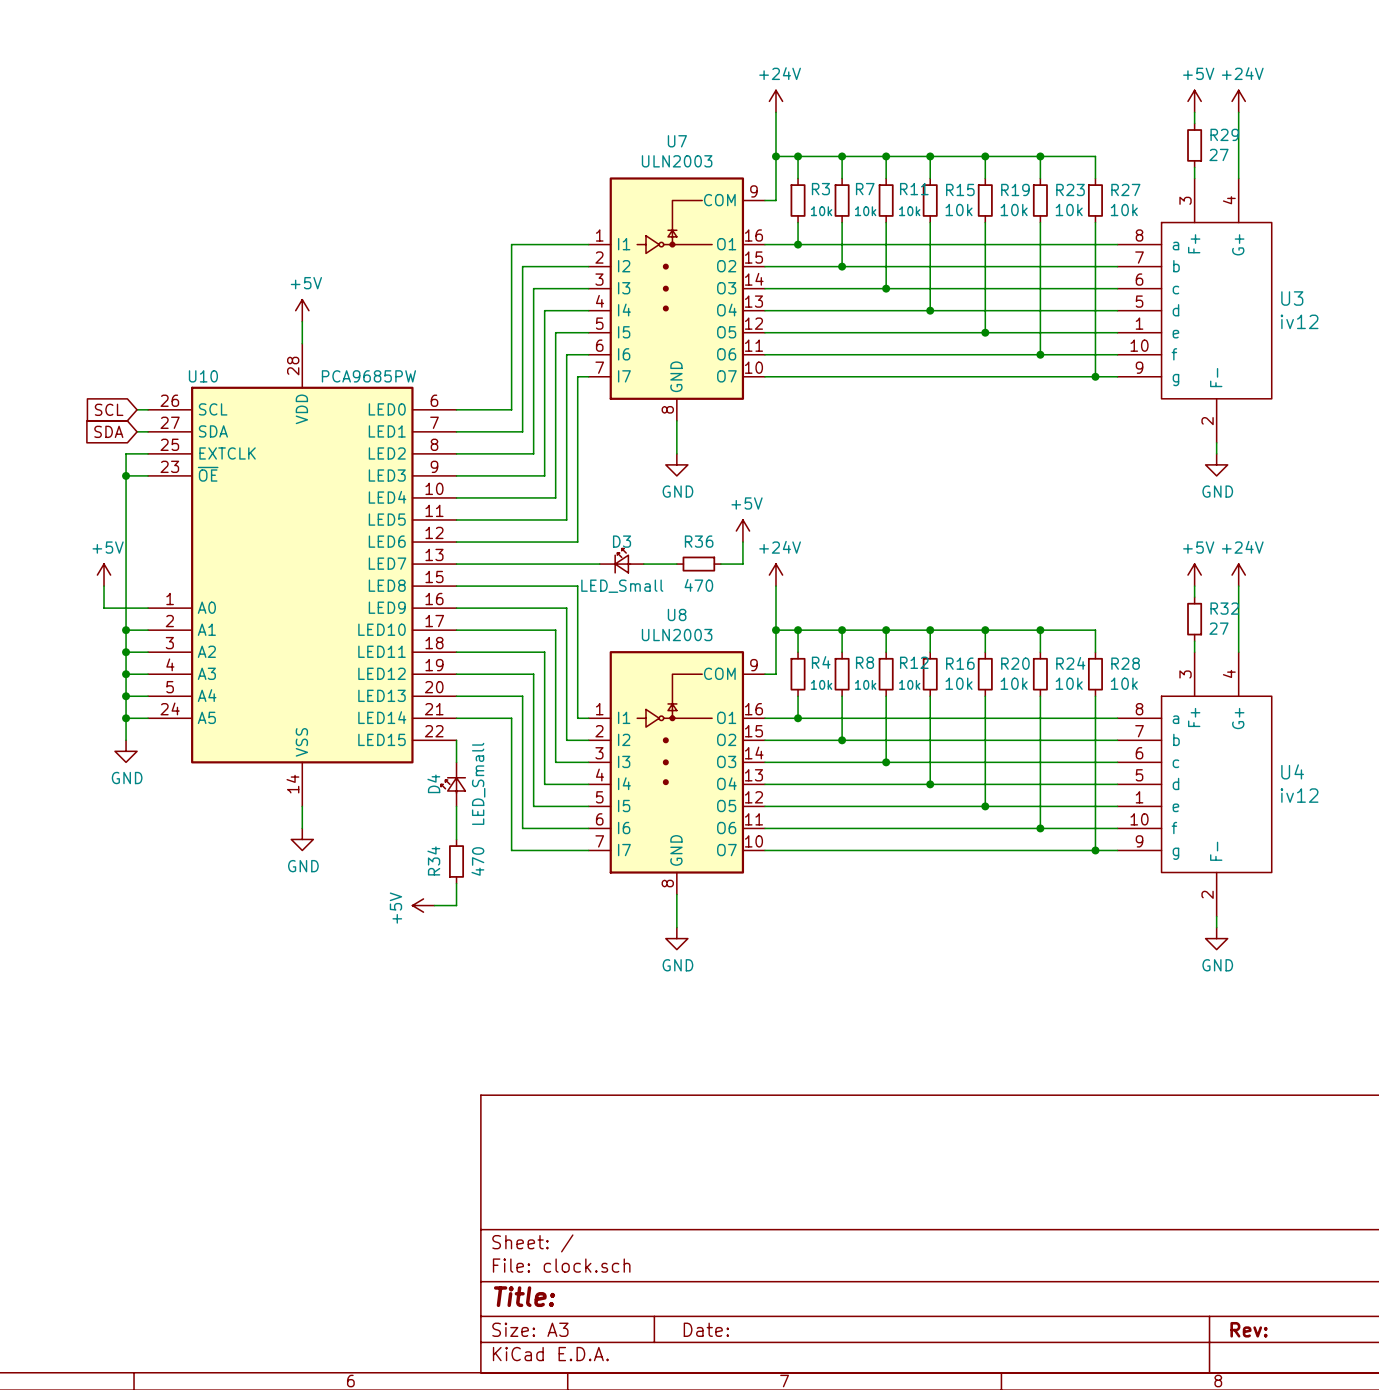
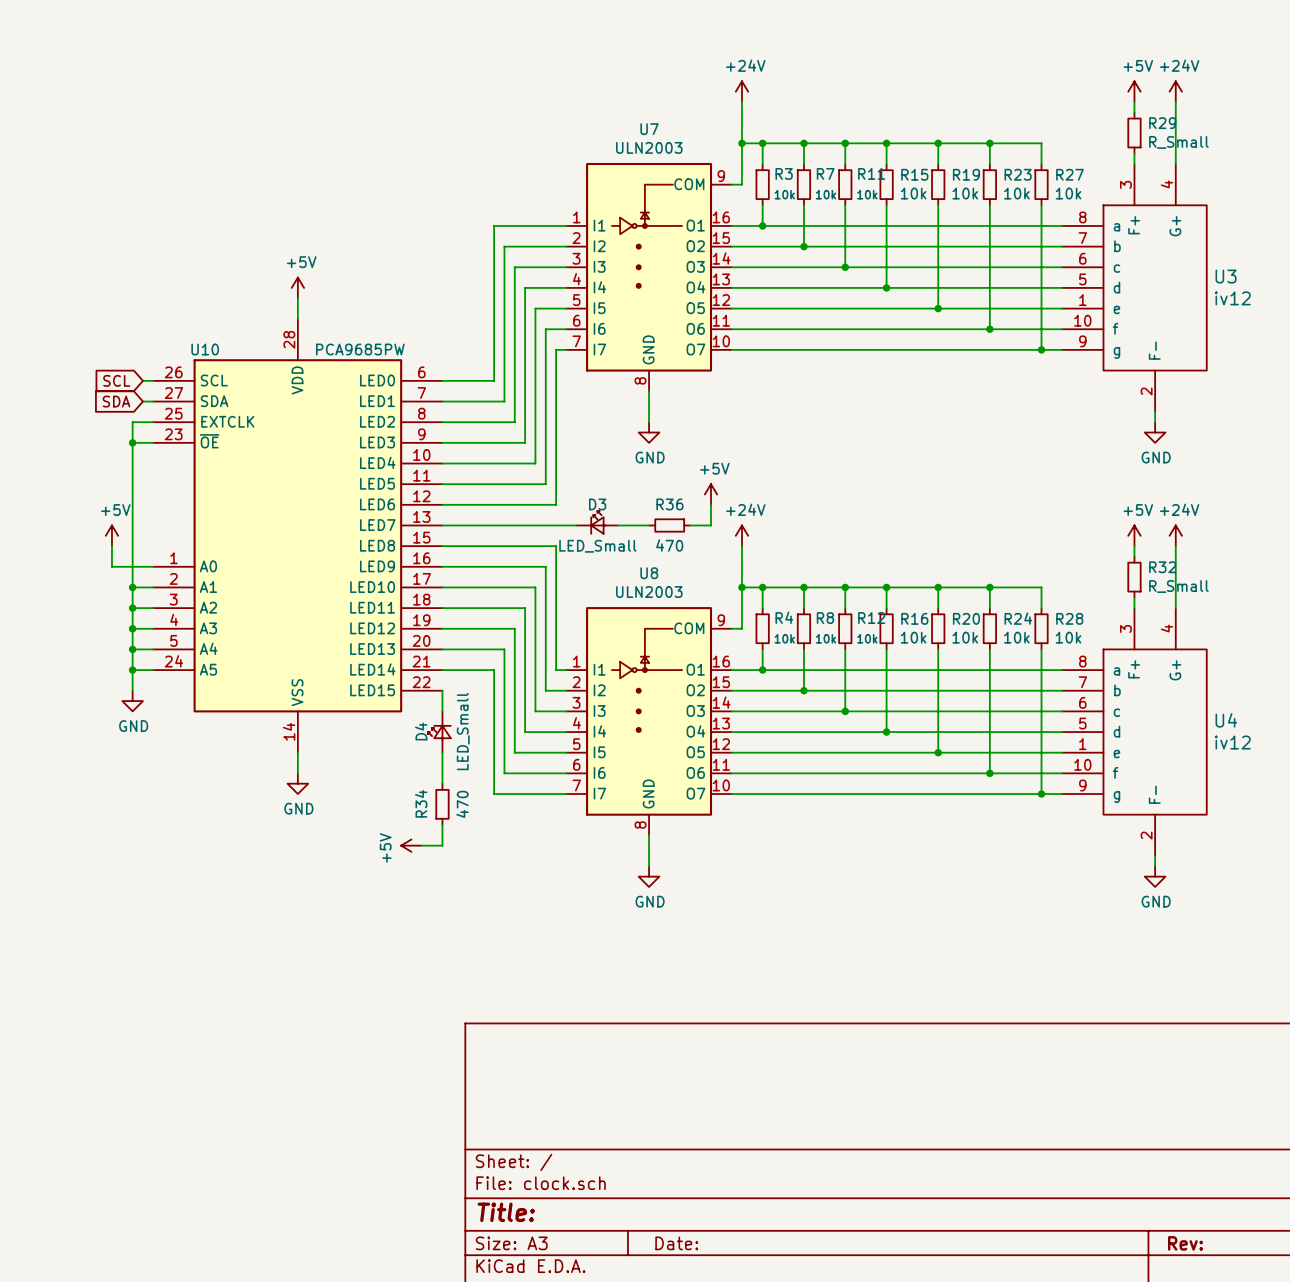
R29 value: 27 (1218, 154) -> R_Small (1178, 142)
R32 value: 27 (1218, 628) -> R_Small (1178, 586)

